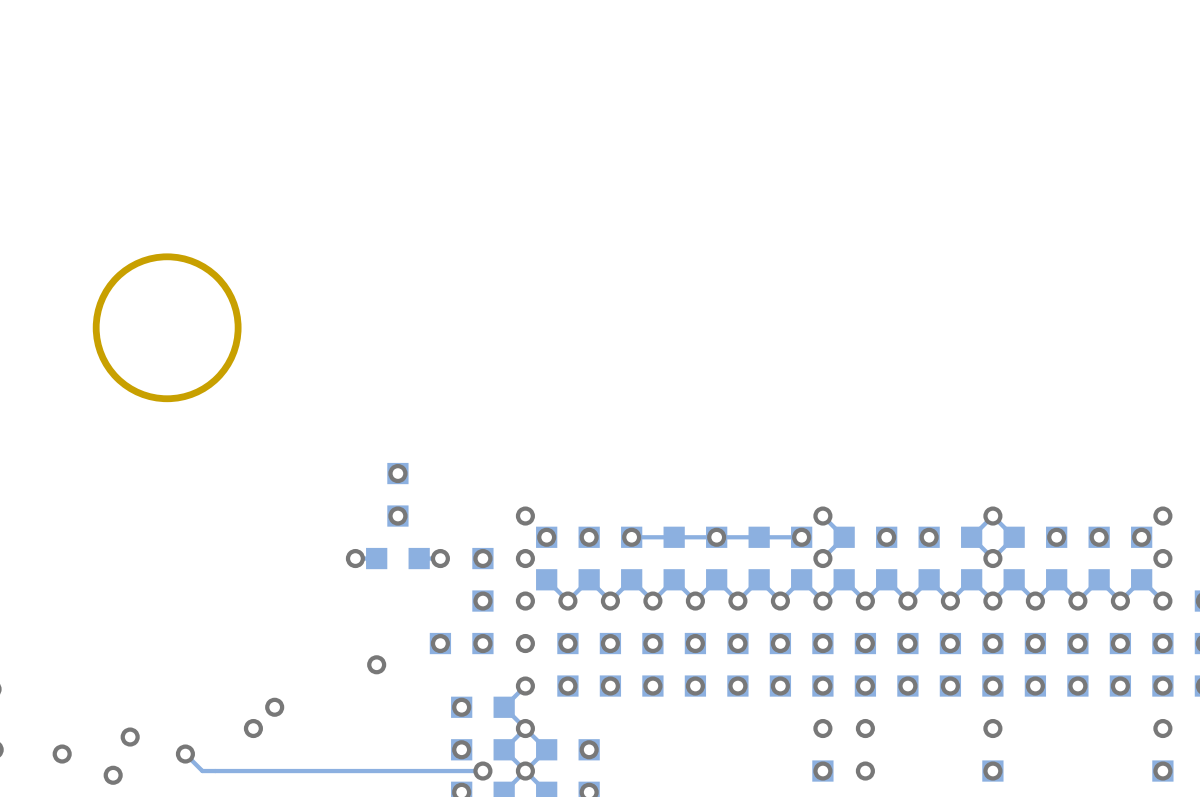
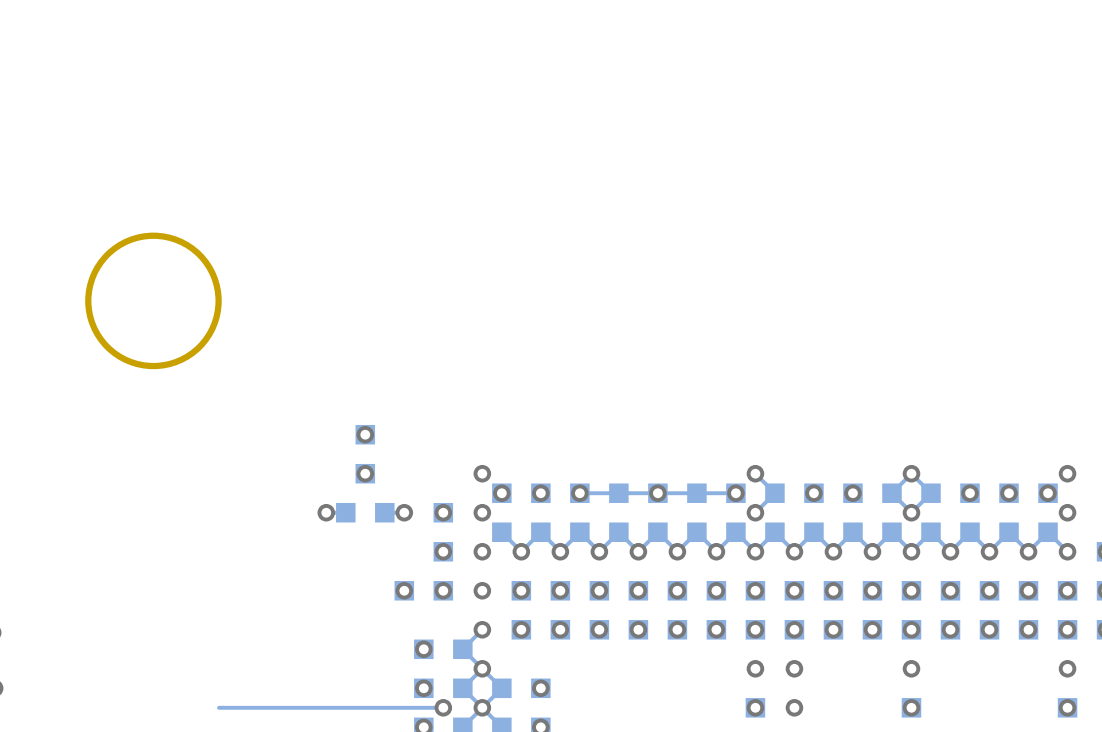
via: (376, 664) -> none
via: (274, 707) -> none
via: (253, 728) -> none
via: (130, 737) -> none
via: (62, 754) -> none
track: (185, 754) (202, 771) (238, 771) -> none
via: (185, 754) -> none
via: (113, 775) -> none

